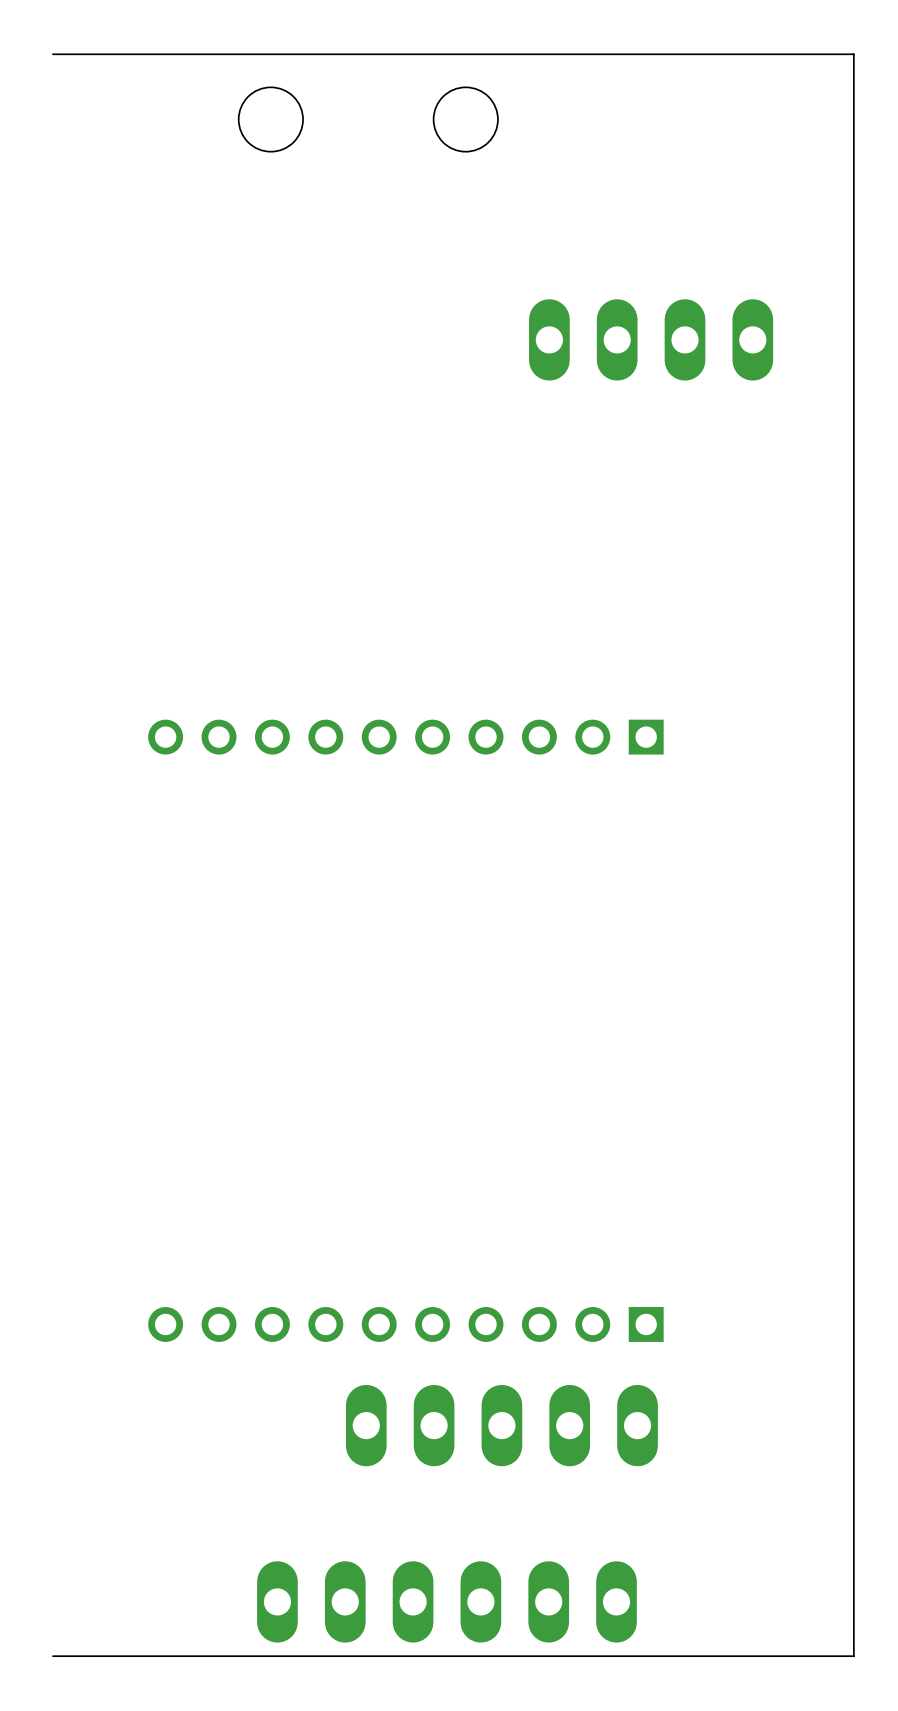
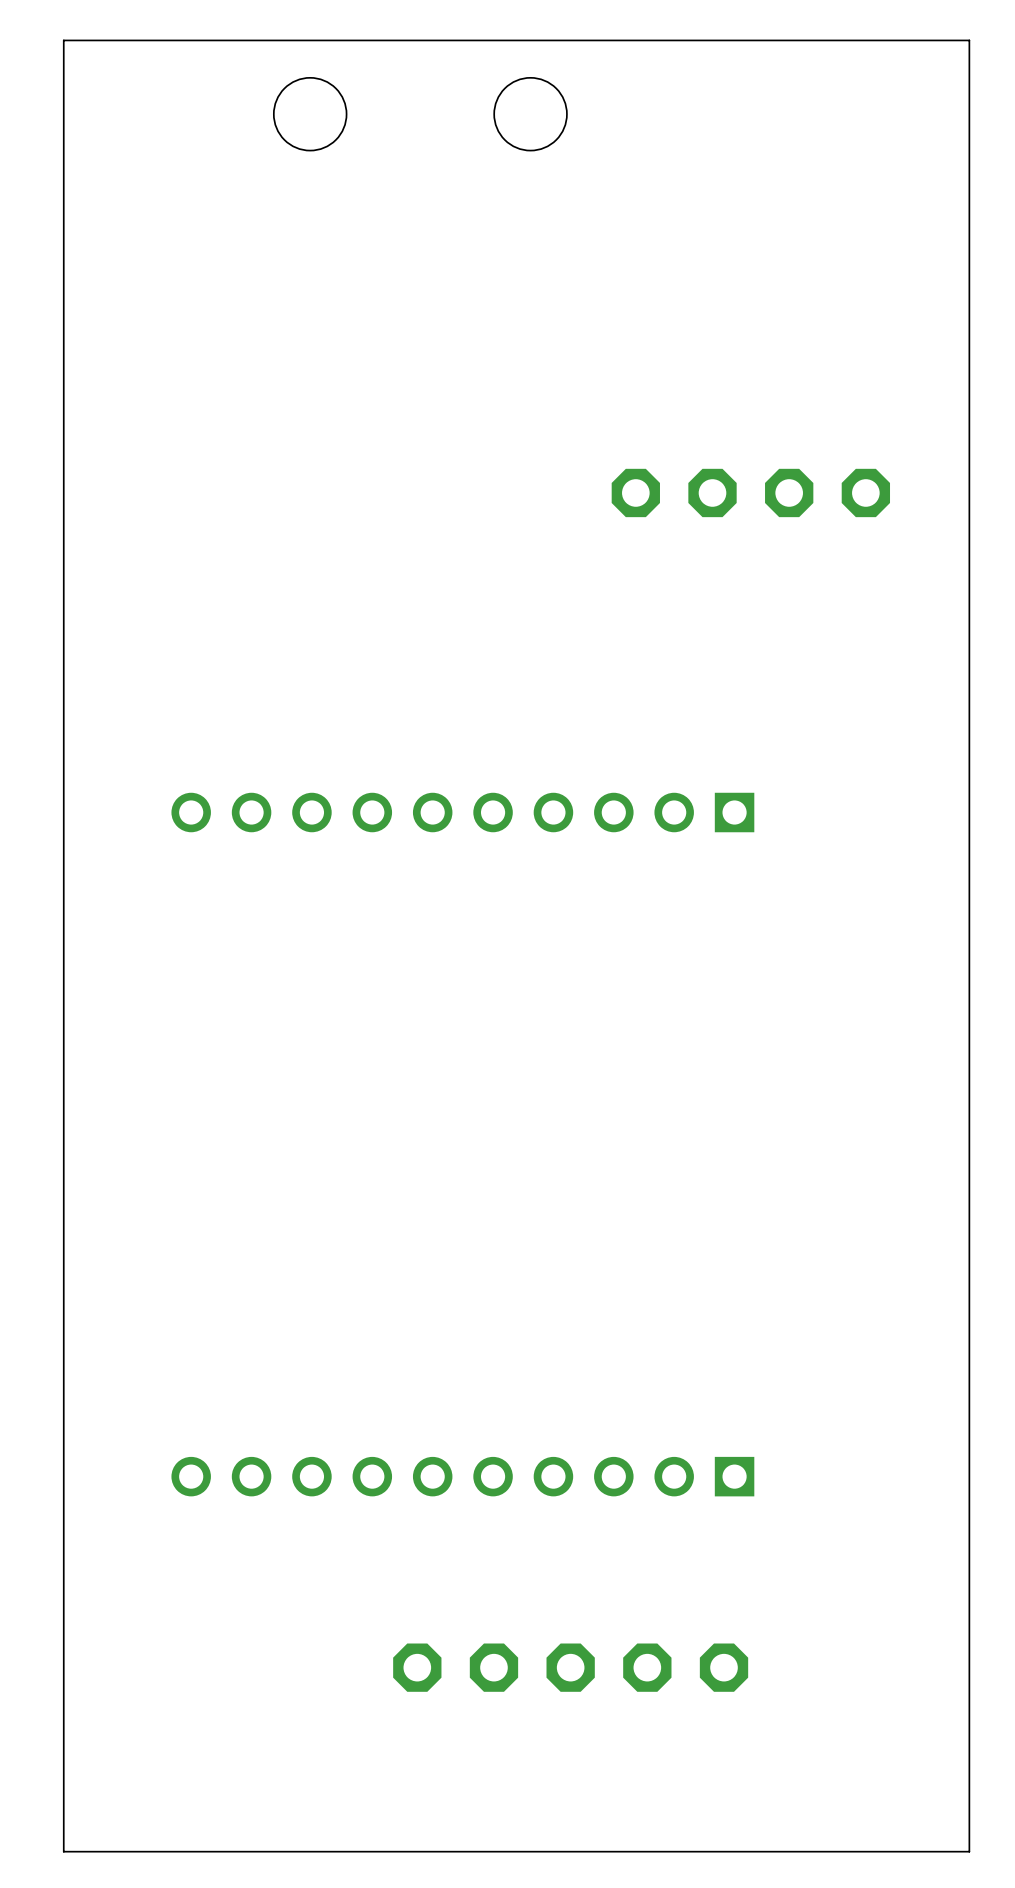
board edge: none -> (63, 40) (63, 1851)
part: (651, 339) -> none
part: none -> (635, 492)
part: none -> (712, 492)
part: none -> (789, 492)
part: none -> (865, 492)
part: (501, 1425) -> none
part: none -> (417, 1667)
part: none -> (493, 1667)
part: none -> (570, 1667)
part: none -> (647, 1667)
part: none -> (724, 1667)
part: (446, 1601) -> none

